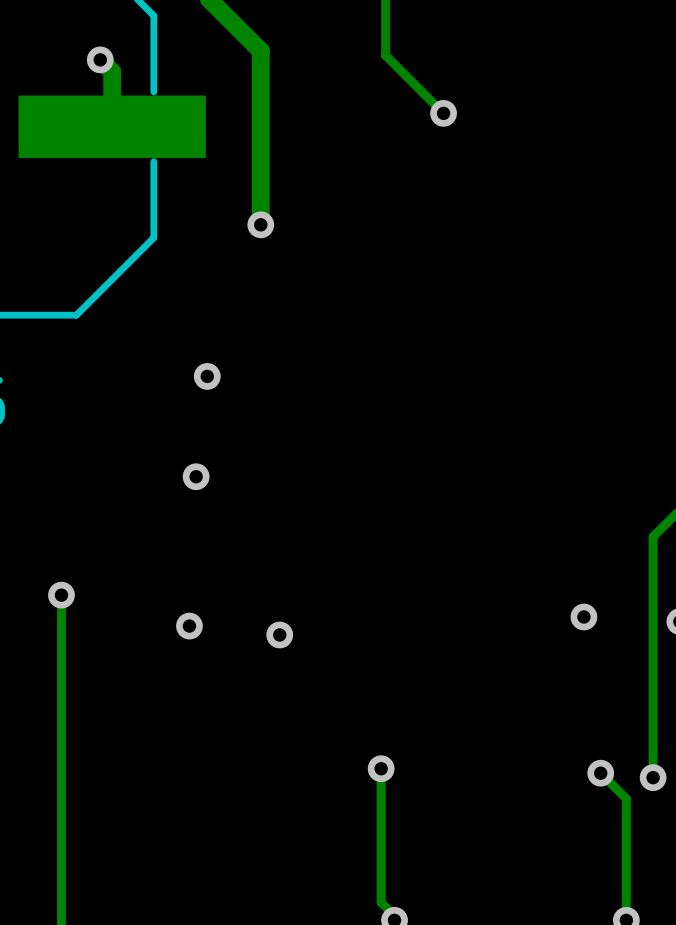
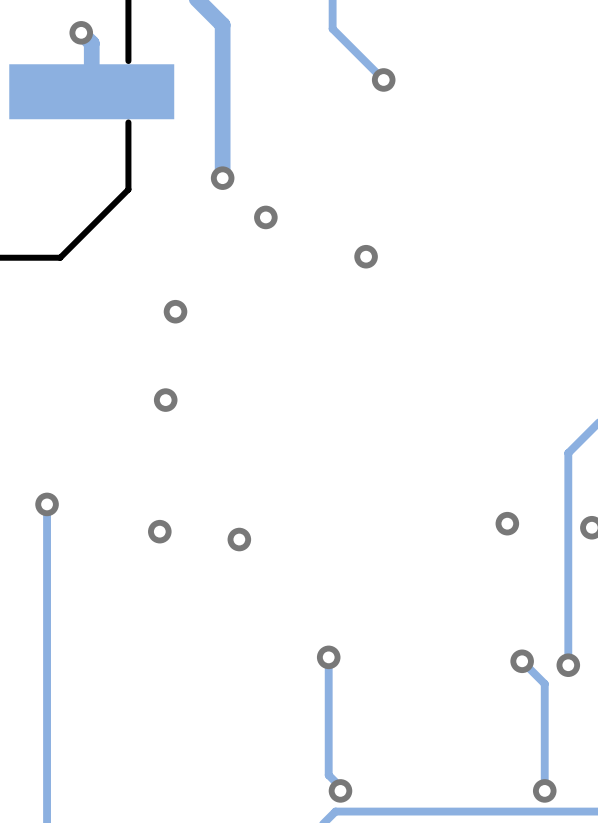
via: none -> (265, 217)
via: none -> (366, 256)

